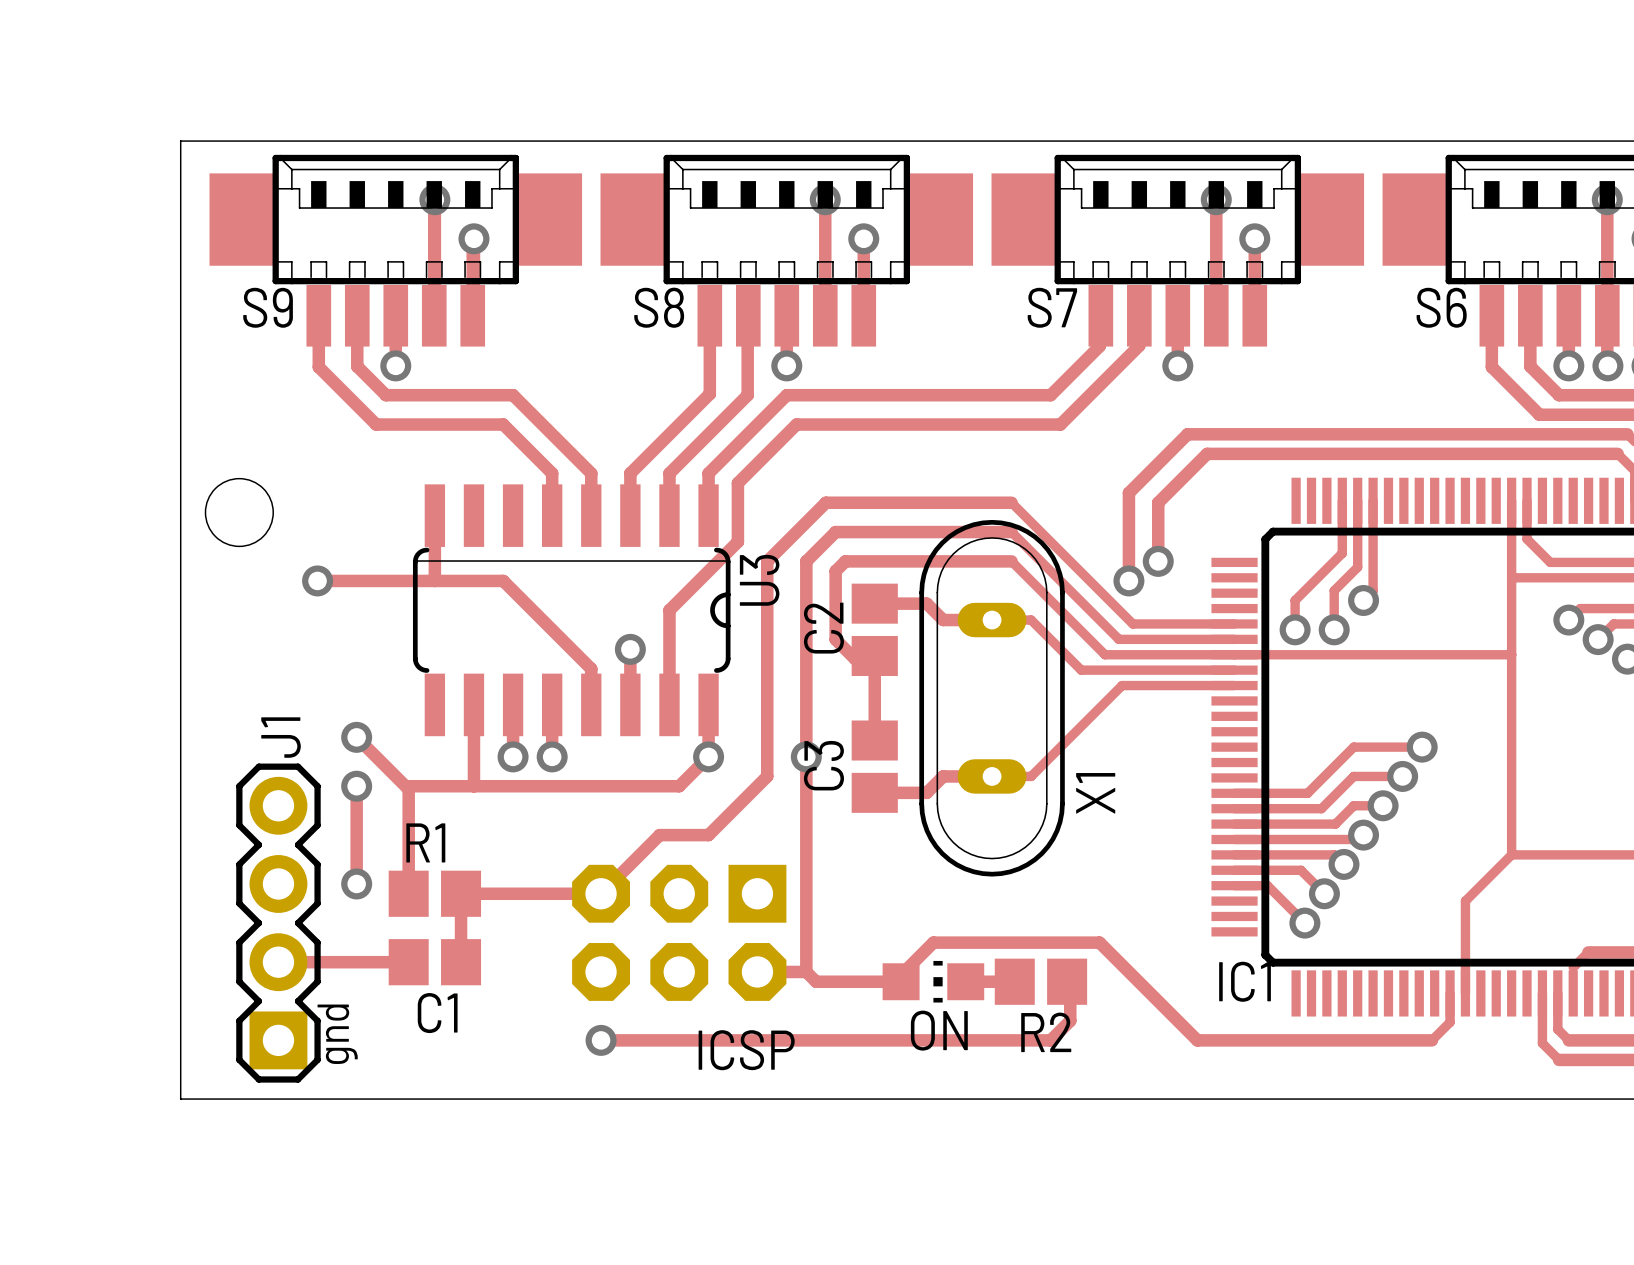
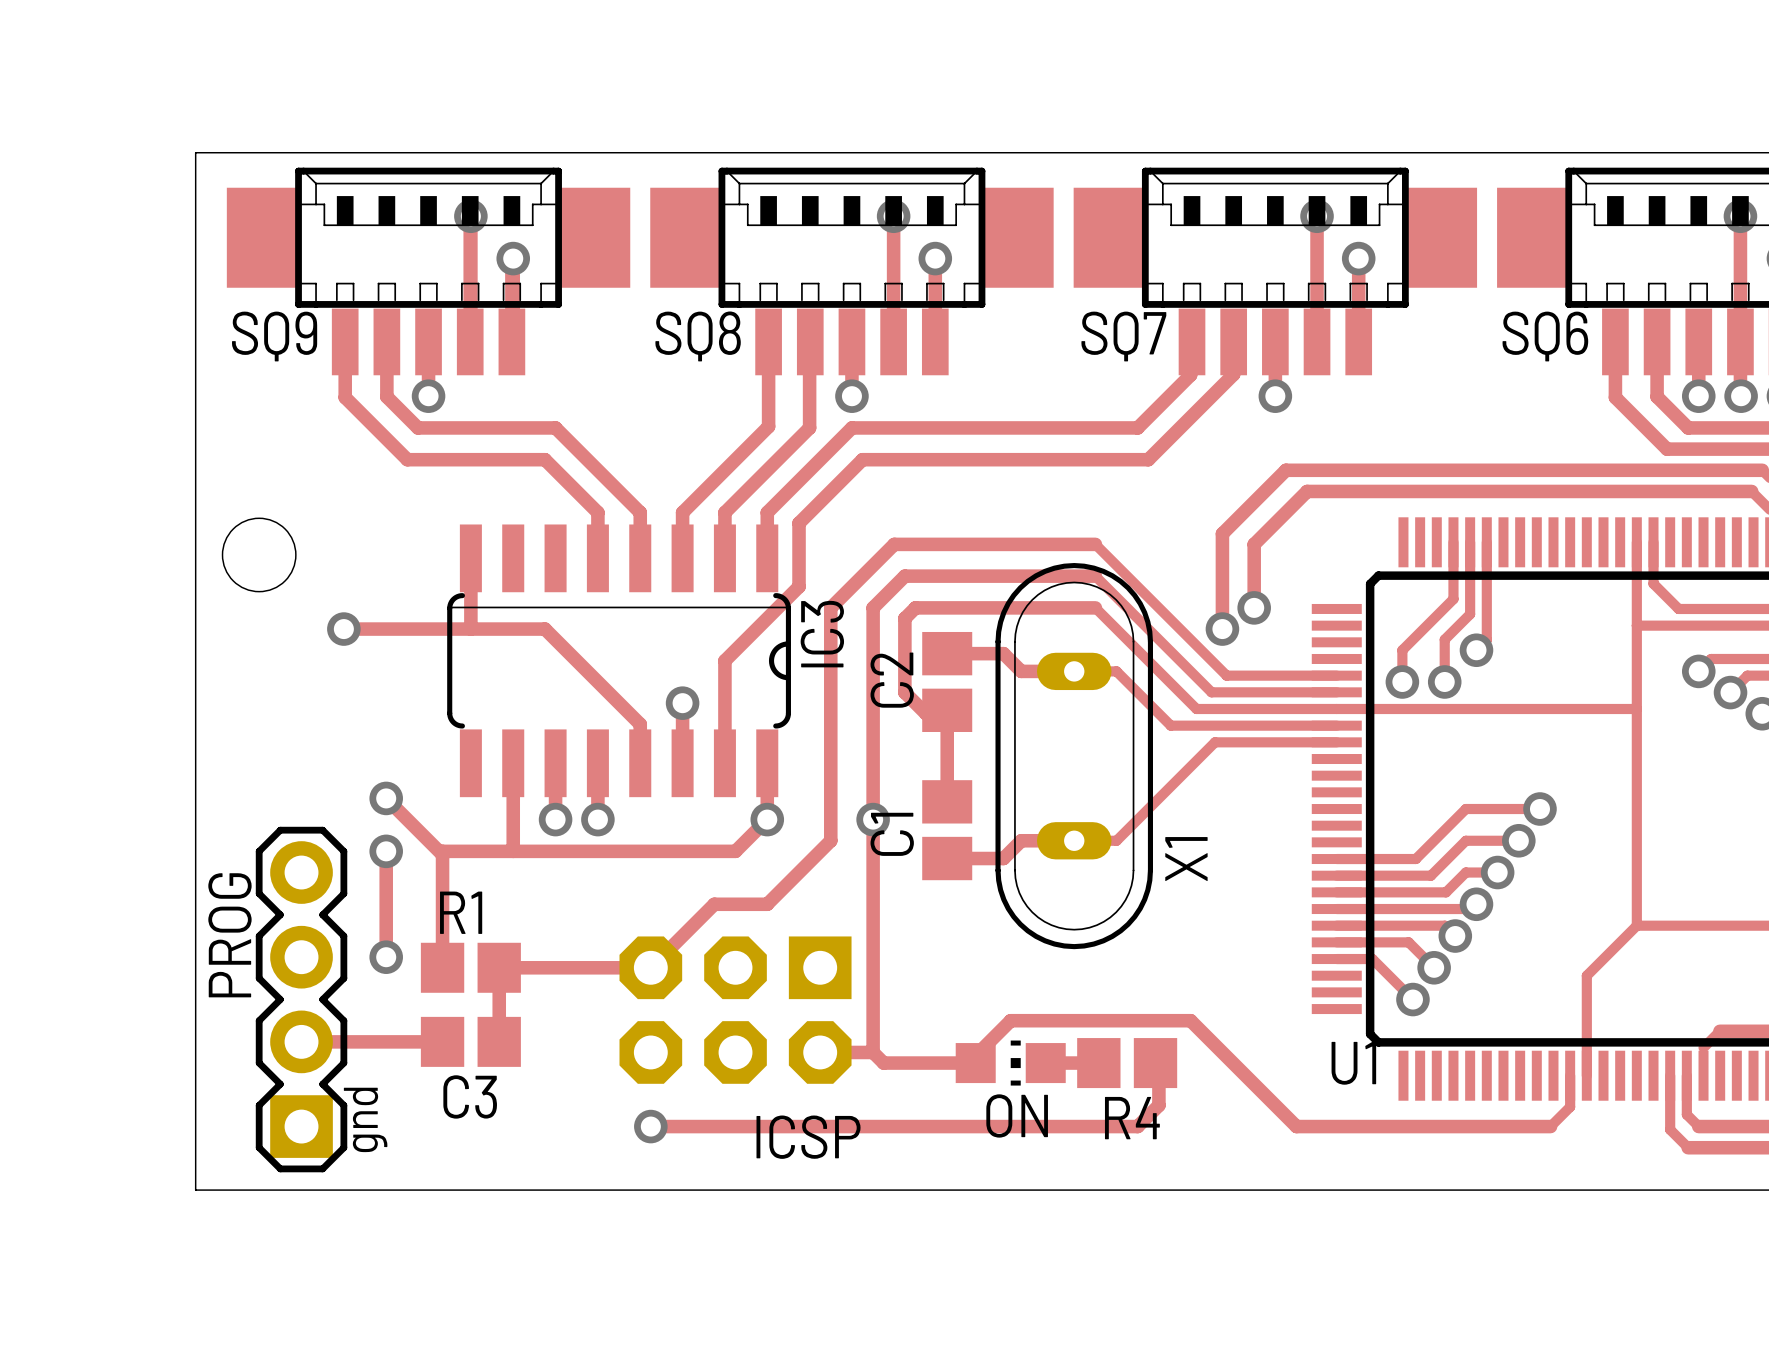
S9 name: S9 (268, 307) -> SQ9 (274, 336)
S8 name: S8 (659, 307) -> SQ8 (698, 336)
S7 name: S7 (1052, 307) -> SQ7 (1123, 336)
S6 name: S6 (1441, 307) -> SQ6 (1545, 336)
U3 name: U3 (759, 580) -> IC3 (822, 634)
J1 name: J1 (281, 737) -> PROG (229, 935)
C3 name: C3 (823, 765) -> C1 (892, 834)
IC1 name: IC1 (1245, 981) -> U1 (1353, 1063)
C1 name: C1 (437, 1013) -> C3 (470, 1096)
R2 name: R2 (1046, 1032) -> R4 (1132, 1118)

